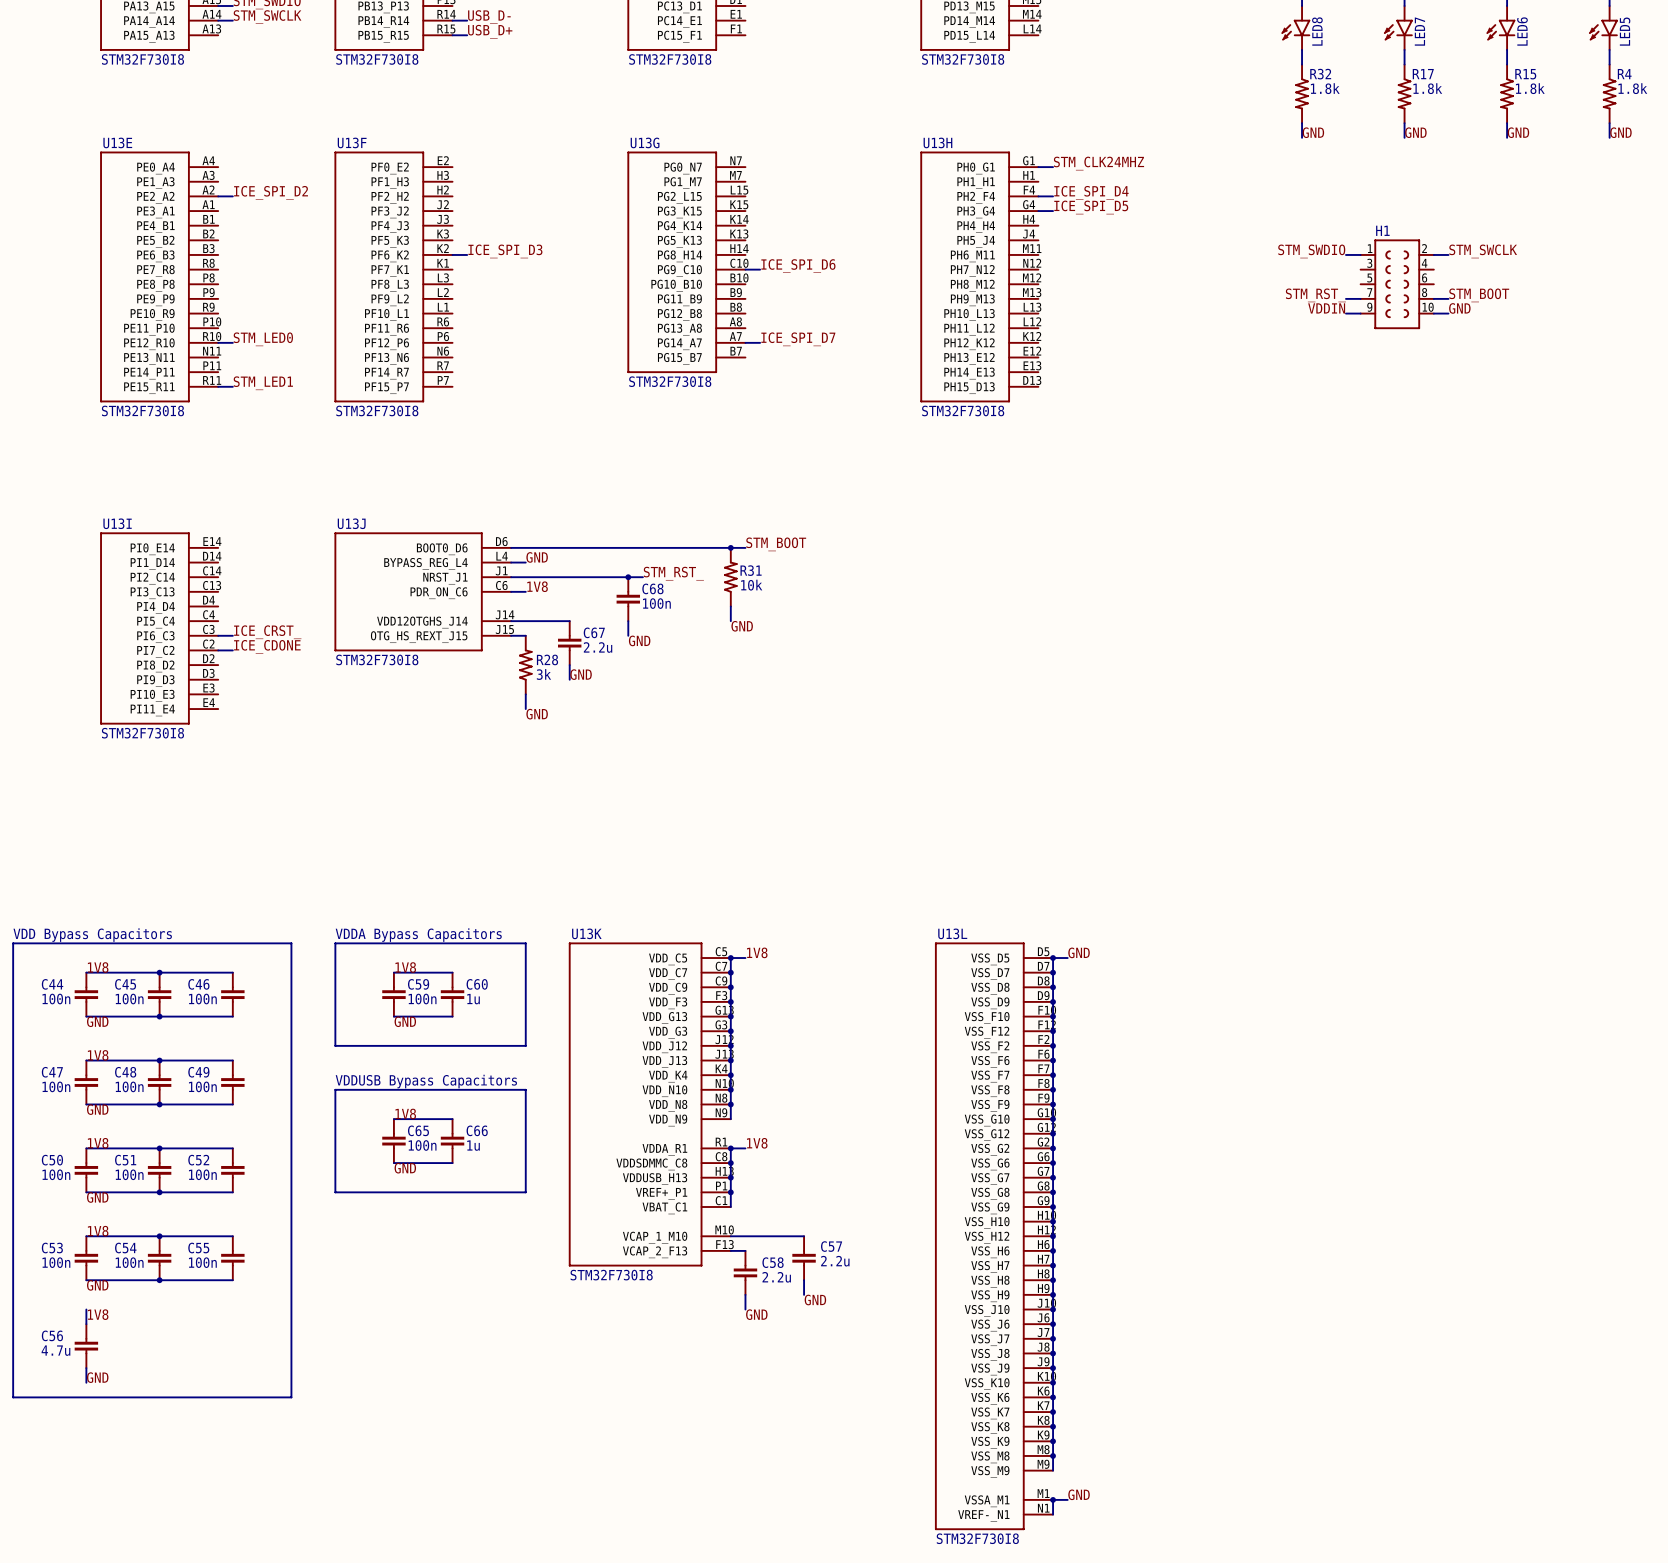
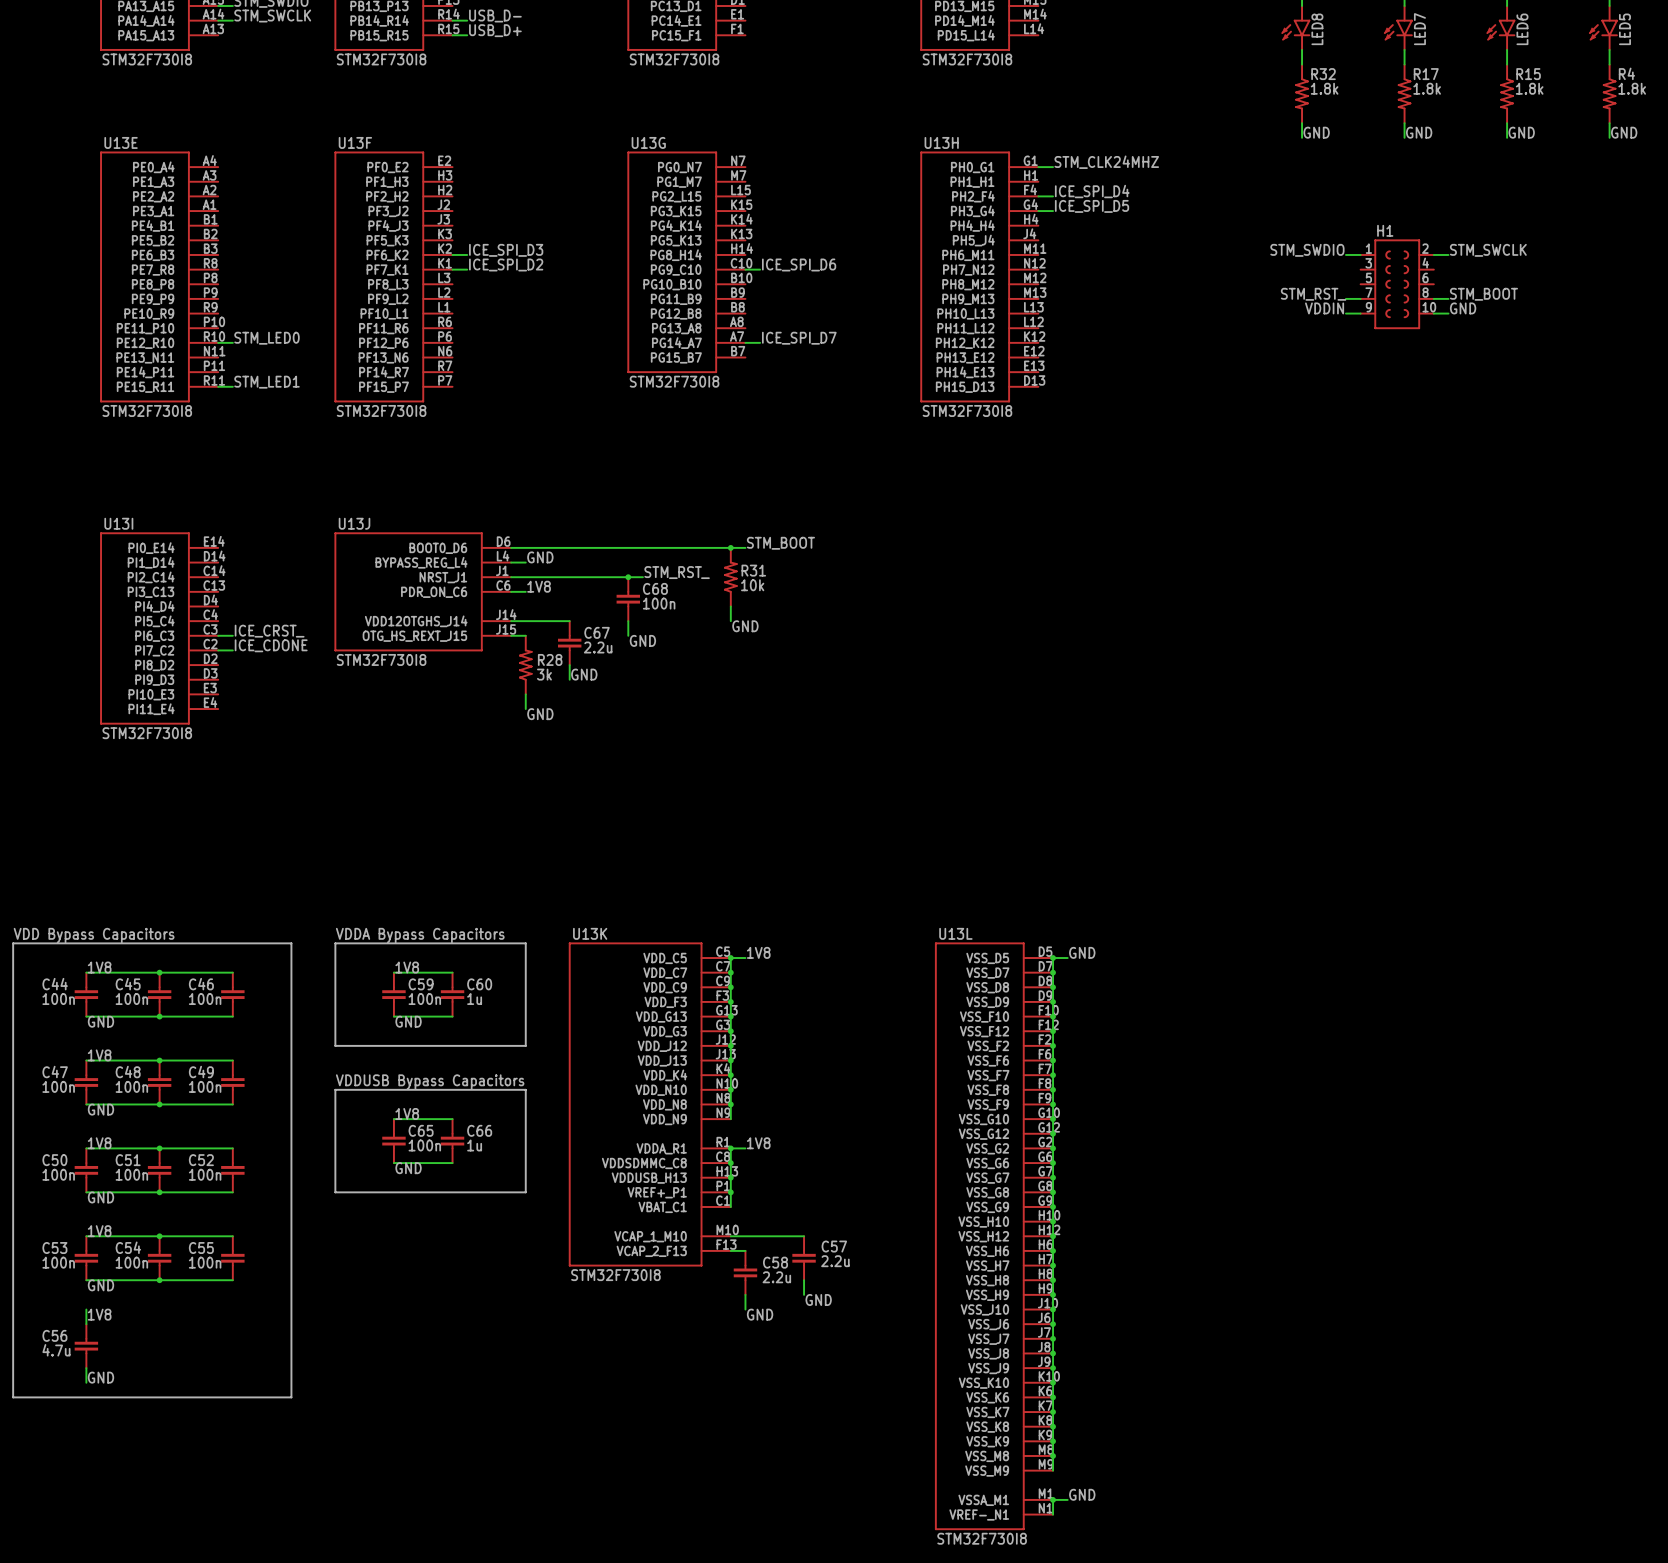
label: ICE_SPI_D2 (271, 192) -> none
wire: (218, 196) (232, 196) -> none
label: none -> ICE_SPI_D2 (506, 264)
wire: none -> (452, 269) (467, 269)

